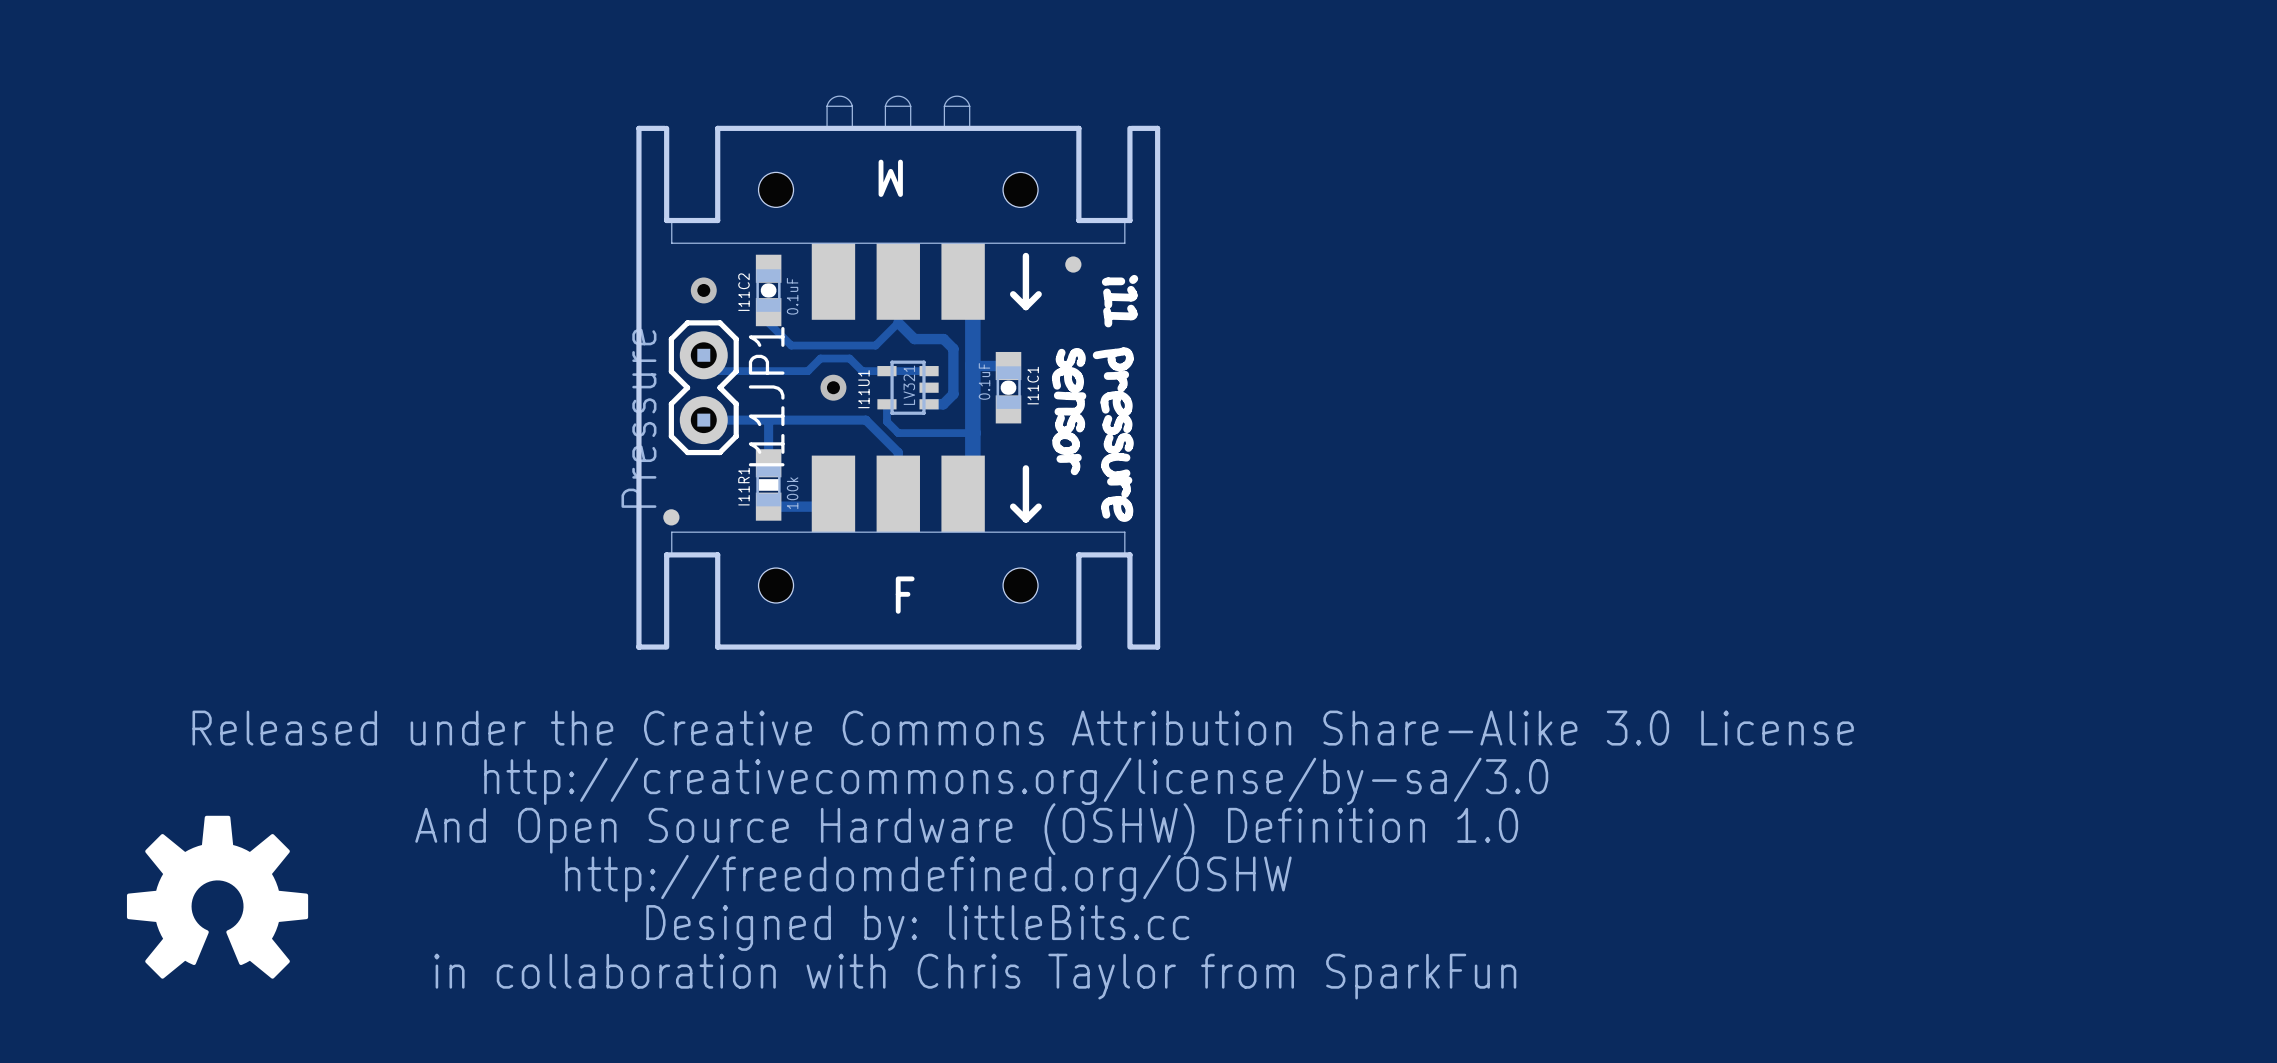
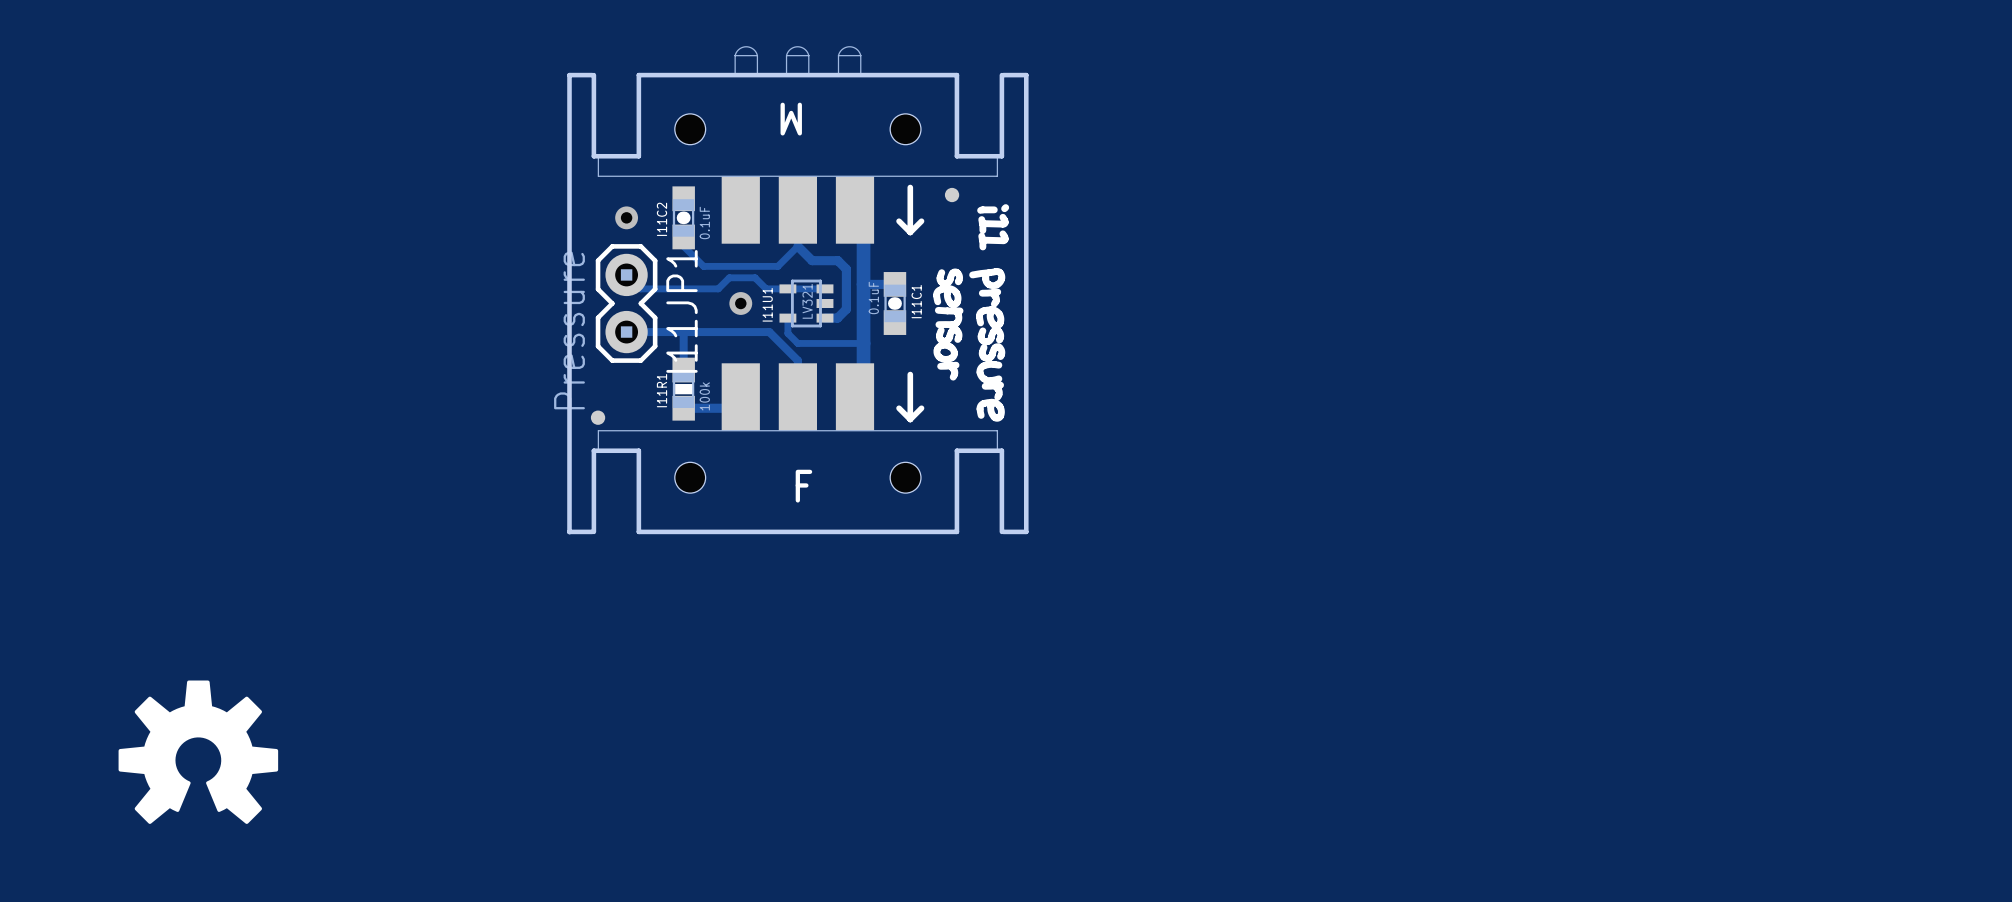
drawing: [192, 710, 1854, 1000] -> none

